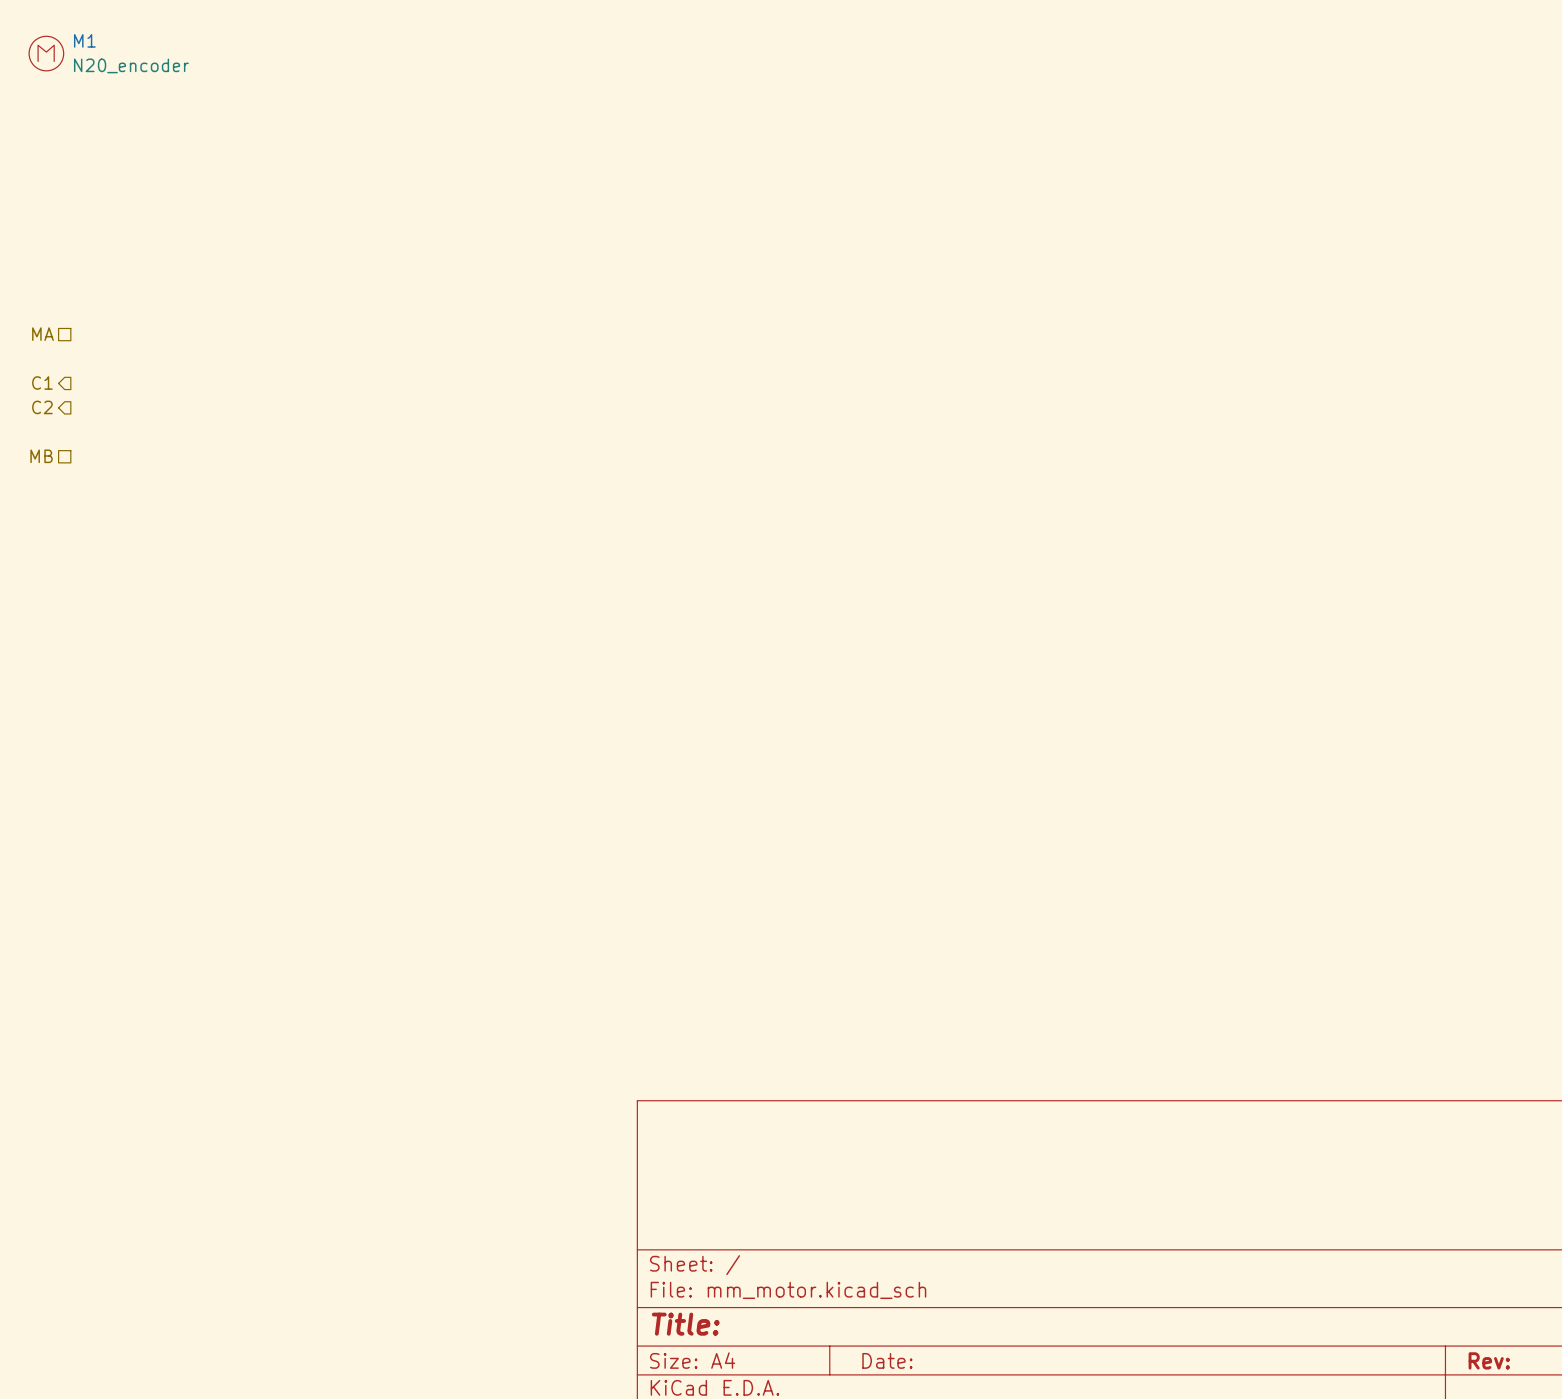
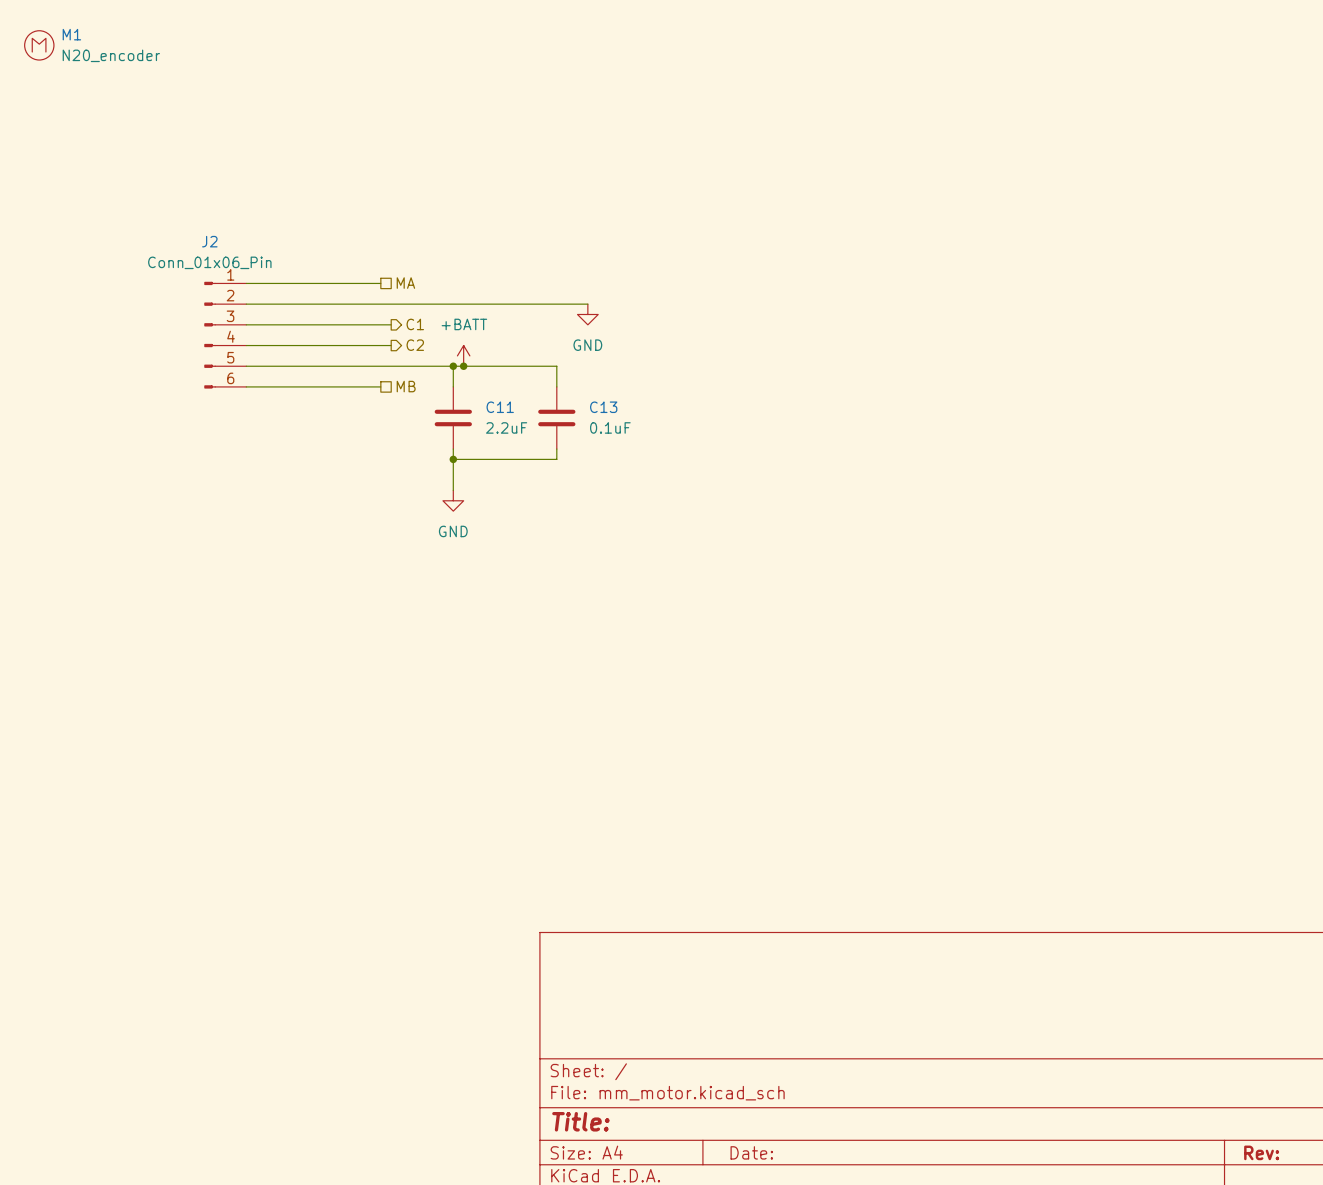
hierarchical label: MA (42, 334) -> none
wire: none -> (246, 283) (380, 283)
hierarchical label: none -> MA (405, 283)
wire: none -> (246, 304) (587, 304)
power symbol: none -> GND (587, 314)
hierarchical label: C1 (42, 382) -> none
hierarchical label: none -> C1 (415, 324)
wire: none -> (246, 324) (391, 324)
J2: none -> Conn_01x06_Pin (225, 335)
hierarchical label: C2 (42, 407) -> none
wire: none -> (246, 345) (391, 345)
hierarchical label: none -> C2 (415, 345)
power symbol: none -> +BATT (463, 355)
wire: none -> (246, 366) (556, 366) (556, 386)
wire: none -> (453, 366) (453, 386)
junction: none -> (453, 366)
junction: none -> (463, 366)
hierarchical label: MB (41, 456) -> none
wire: none -> (246, 386) (380, 386)
hierarchical label: none -> MB (406, 386)
C11: none -> 2.2uF (453, 417)
C13: none -> 0.1uF (556, 417)
wire: none -> (453, 449) (453, 490)
wire: none -> (556, 449) (556, 459) (453, 459)
junction: none -> (453, 459)
power symbol: none -> GND (453, 500)

